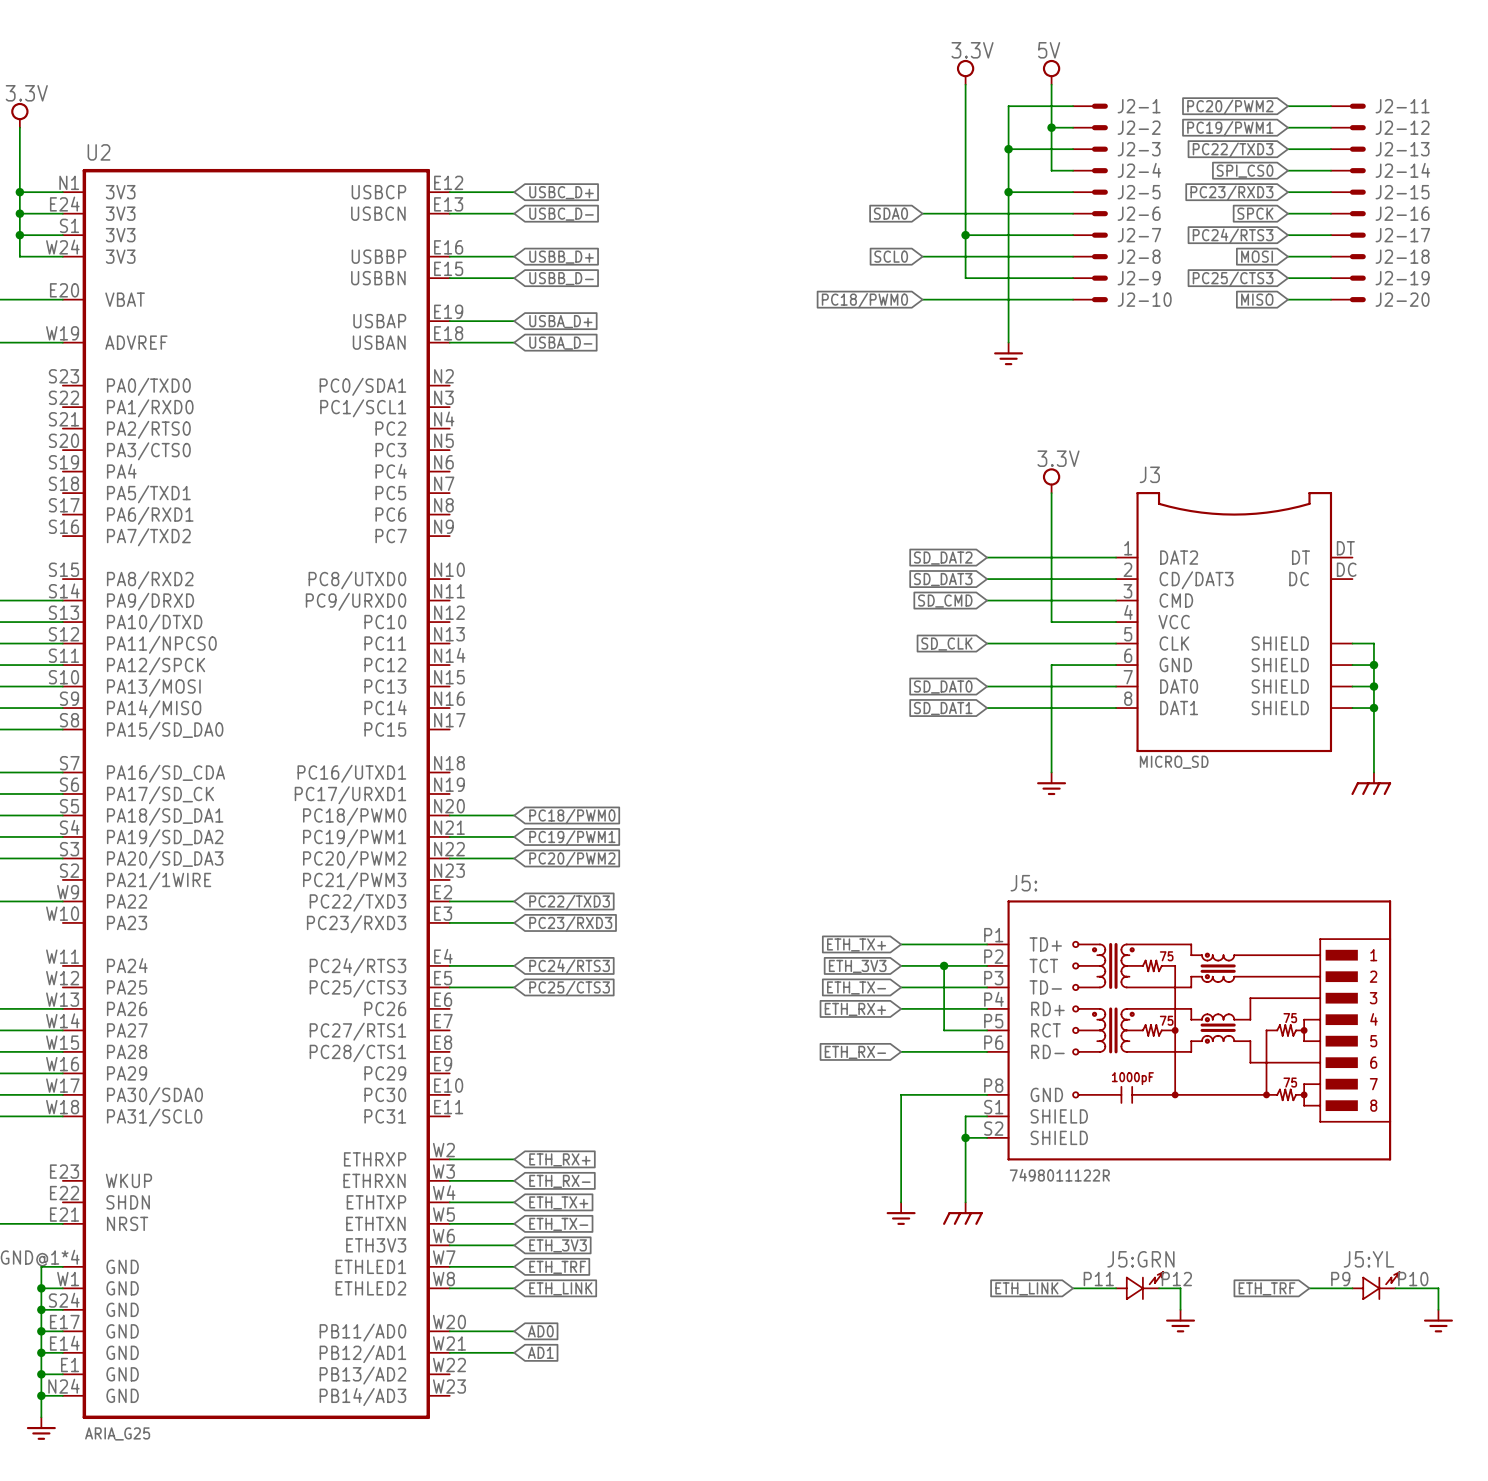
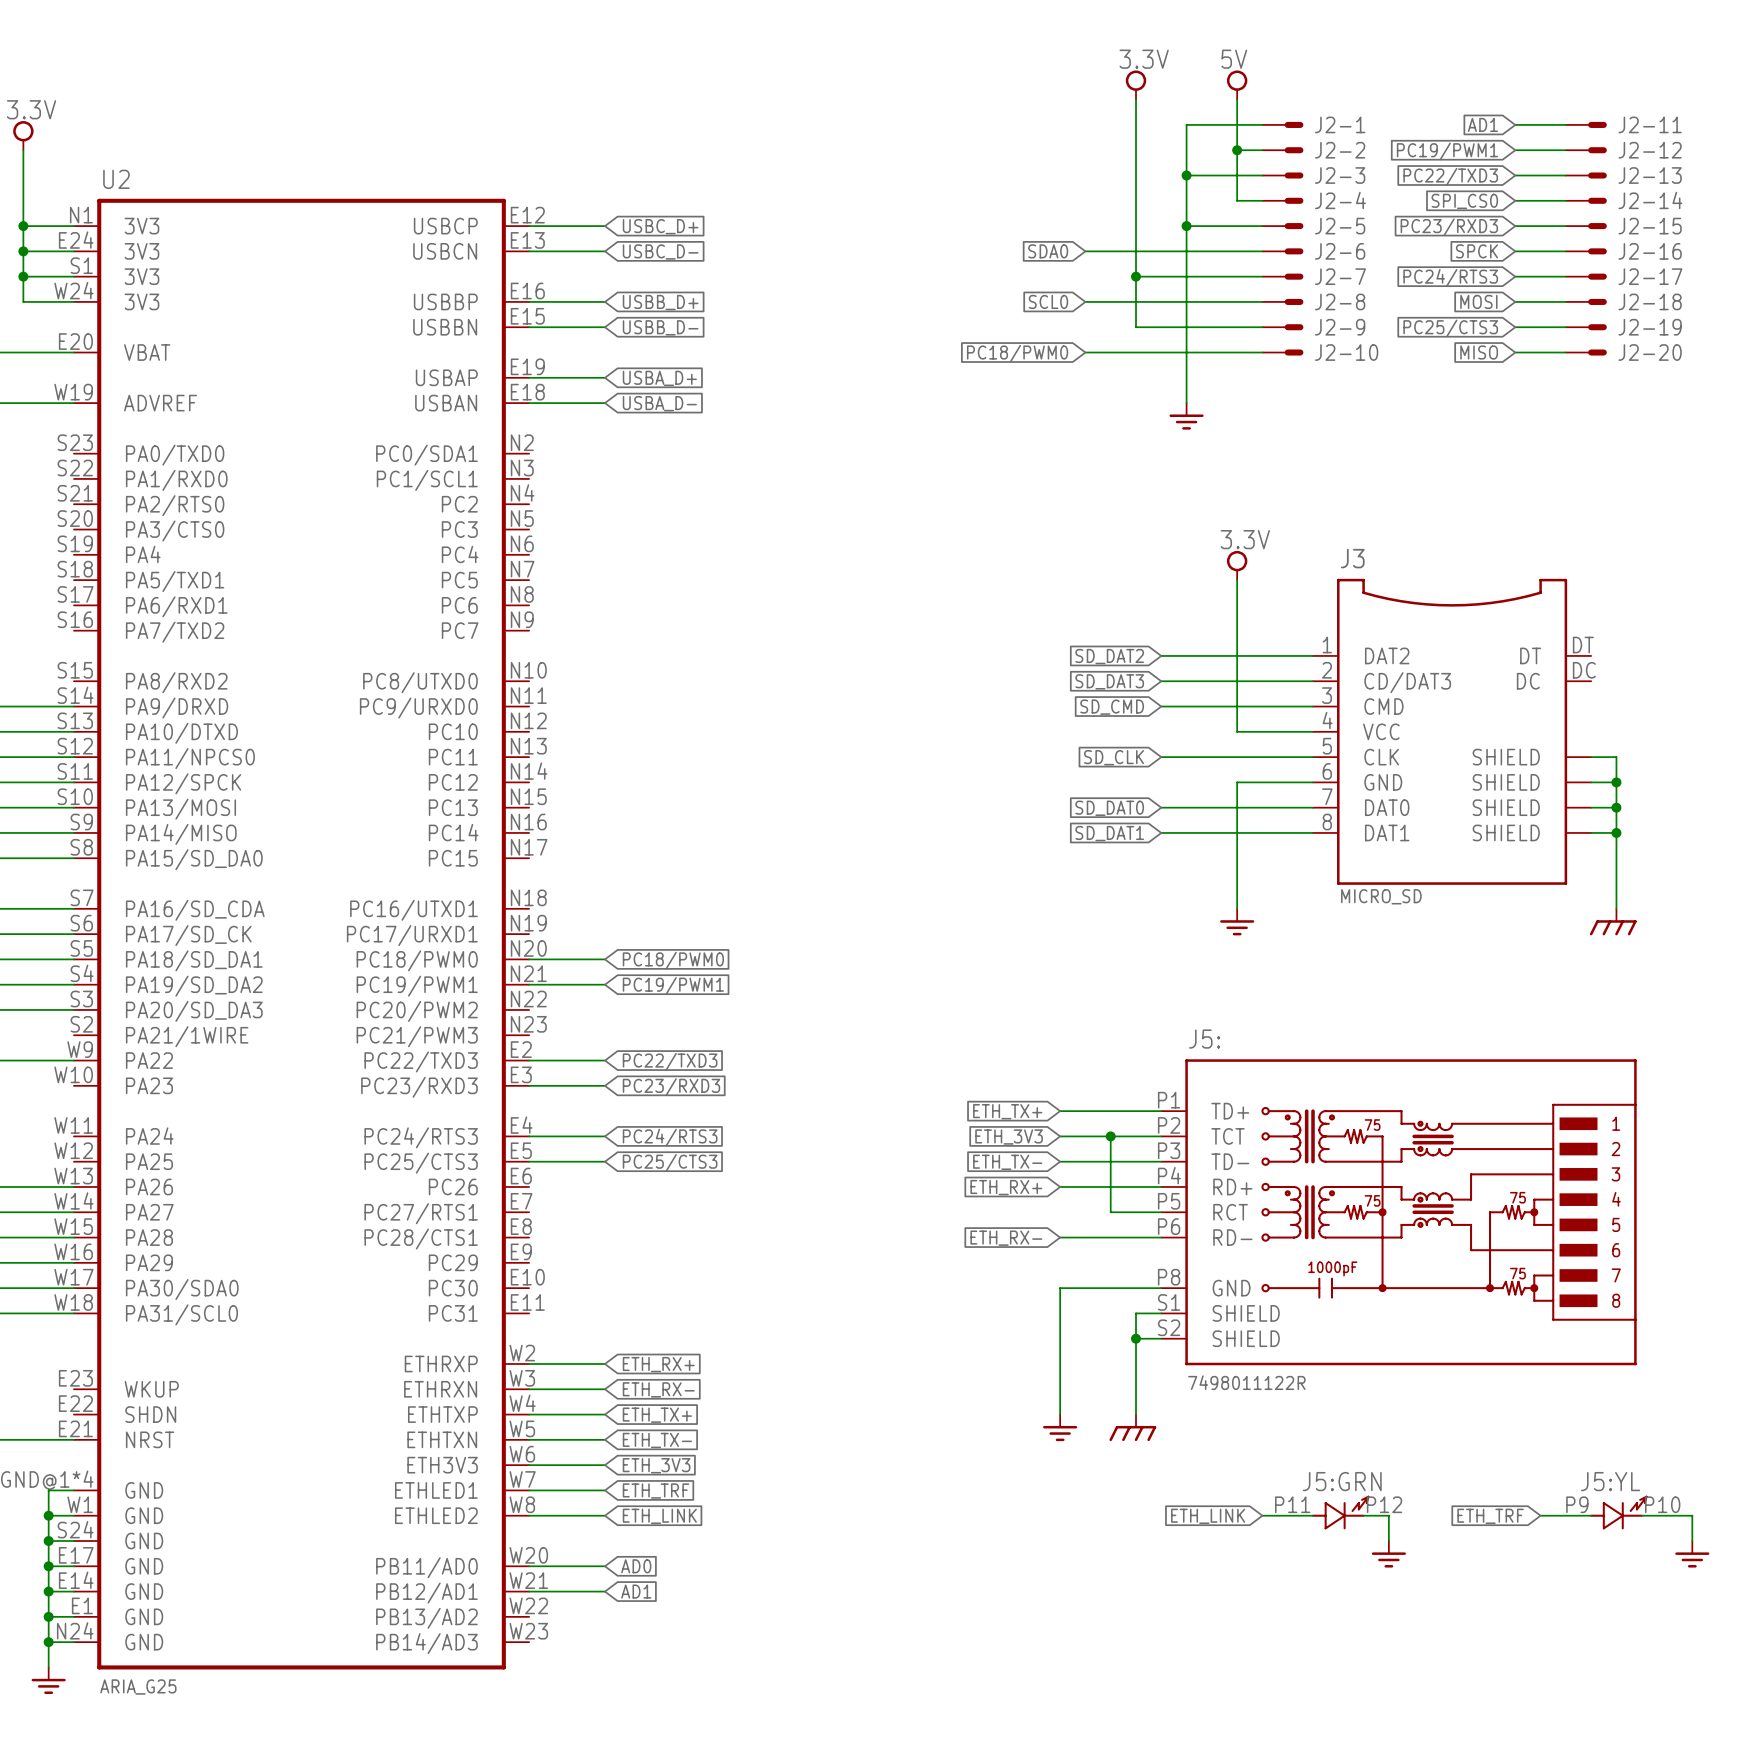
global label: PC20/PWM2 (1230, 107) -> AD1 (1482, 124)
wire: (449, 858) (514, 858) -> none
global label: PC20/PWM2 (572, 859) -> none

